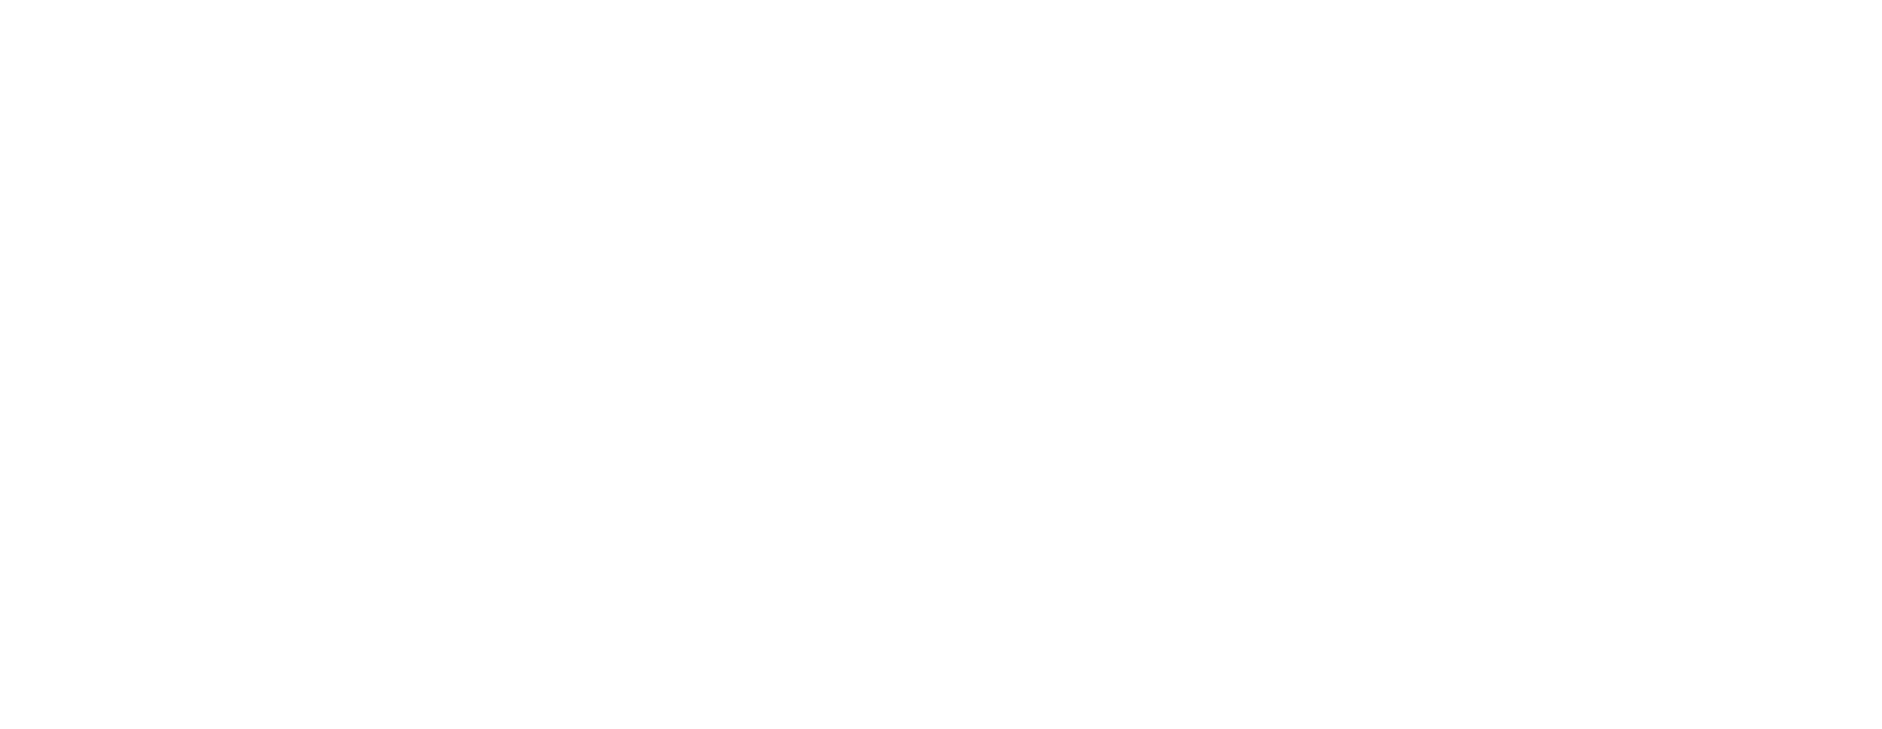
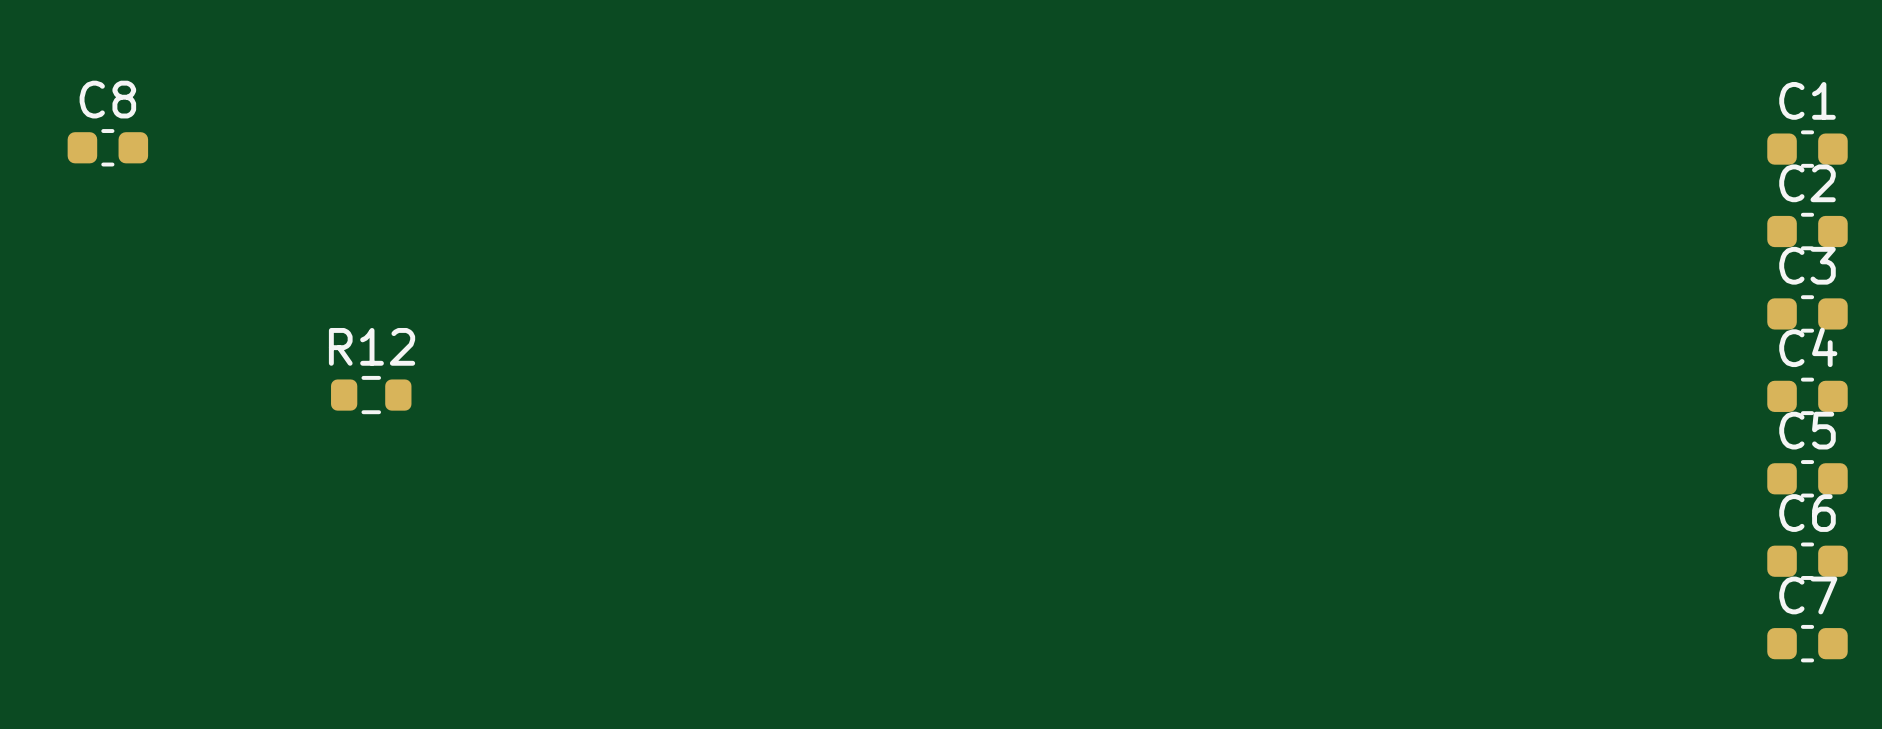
C8: none -> (107, 147)
C1: none -> (1807, 149)
C2: none -> (1807, 231)
C3: none -> (1807, 313)
R12: none -> (371, 395)
C4: none -> (1807, 396)
C5: none -> (1807, 478)
C6: none -> (1807, 561)
C7: none -> (1807, 643)

